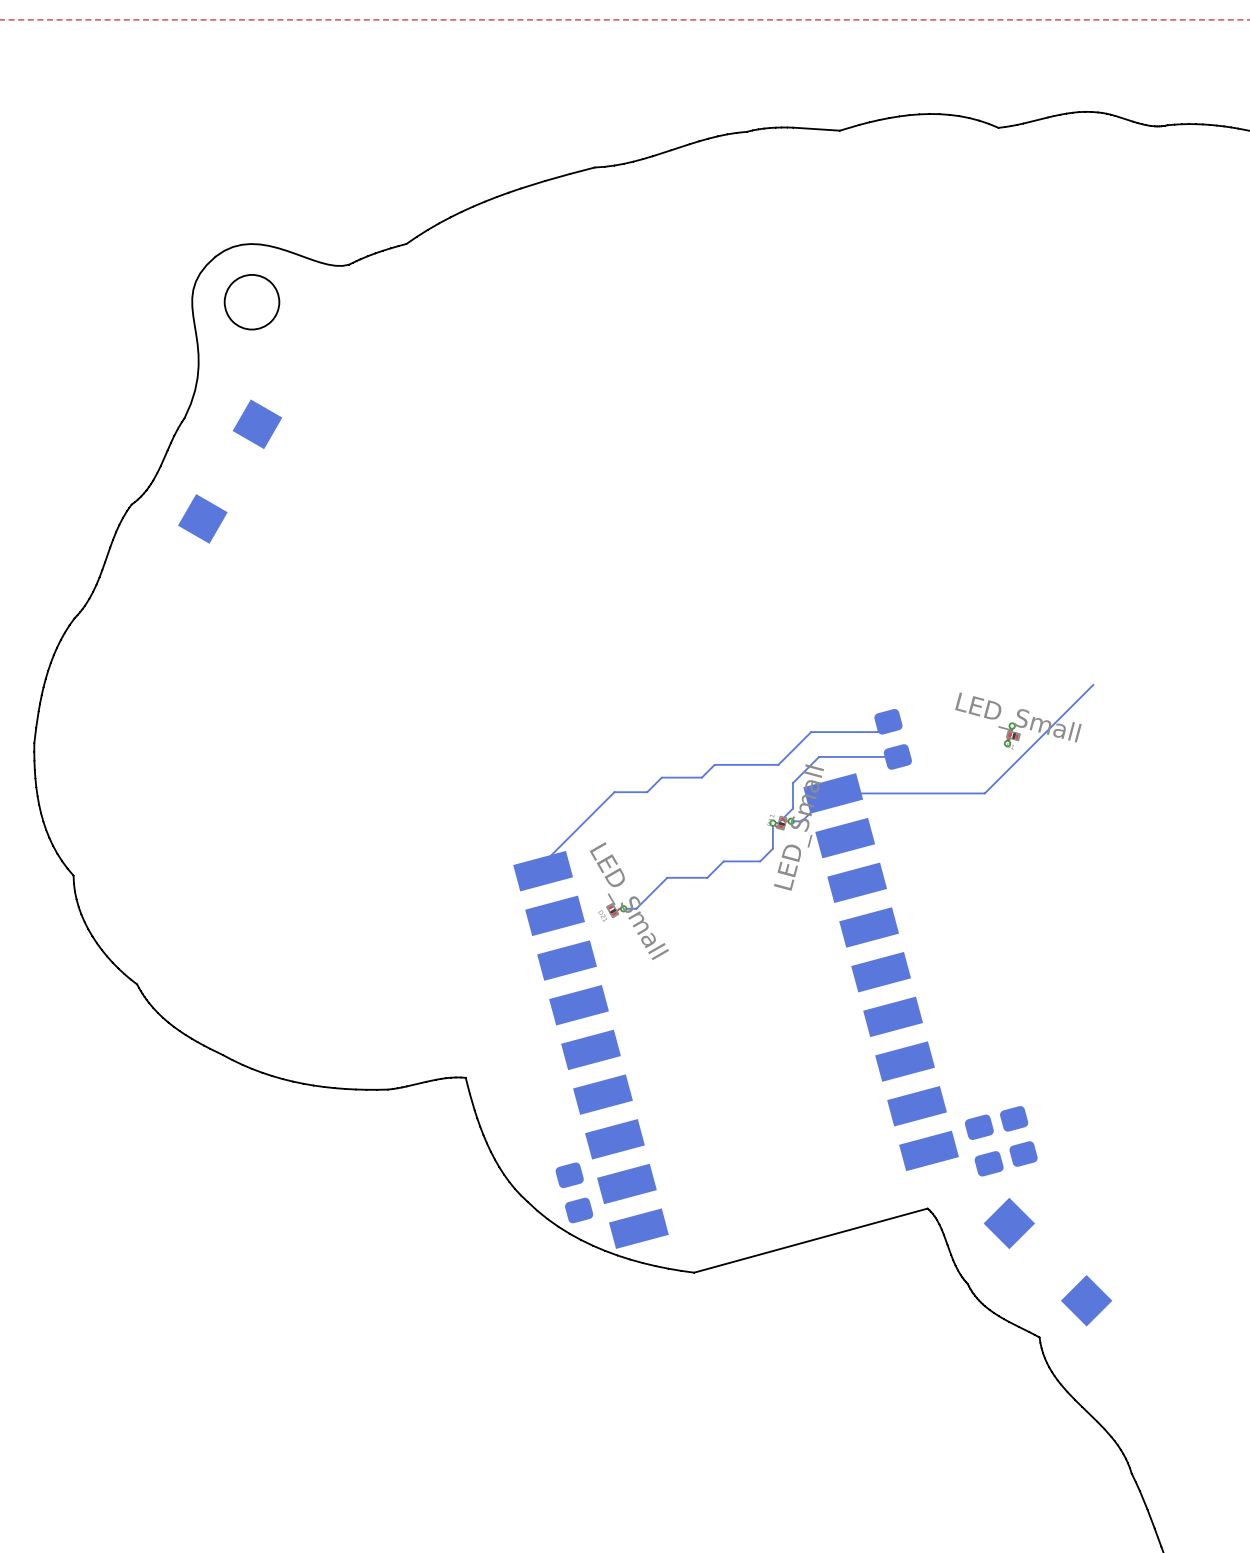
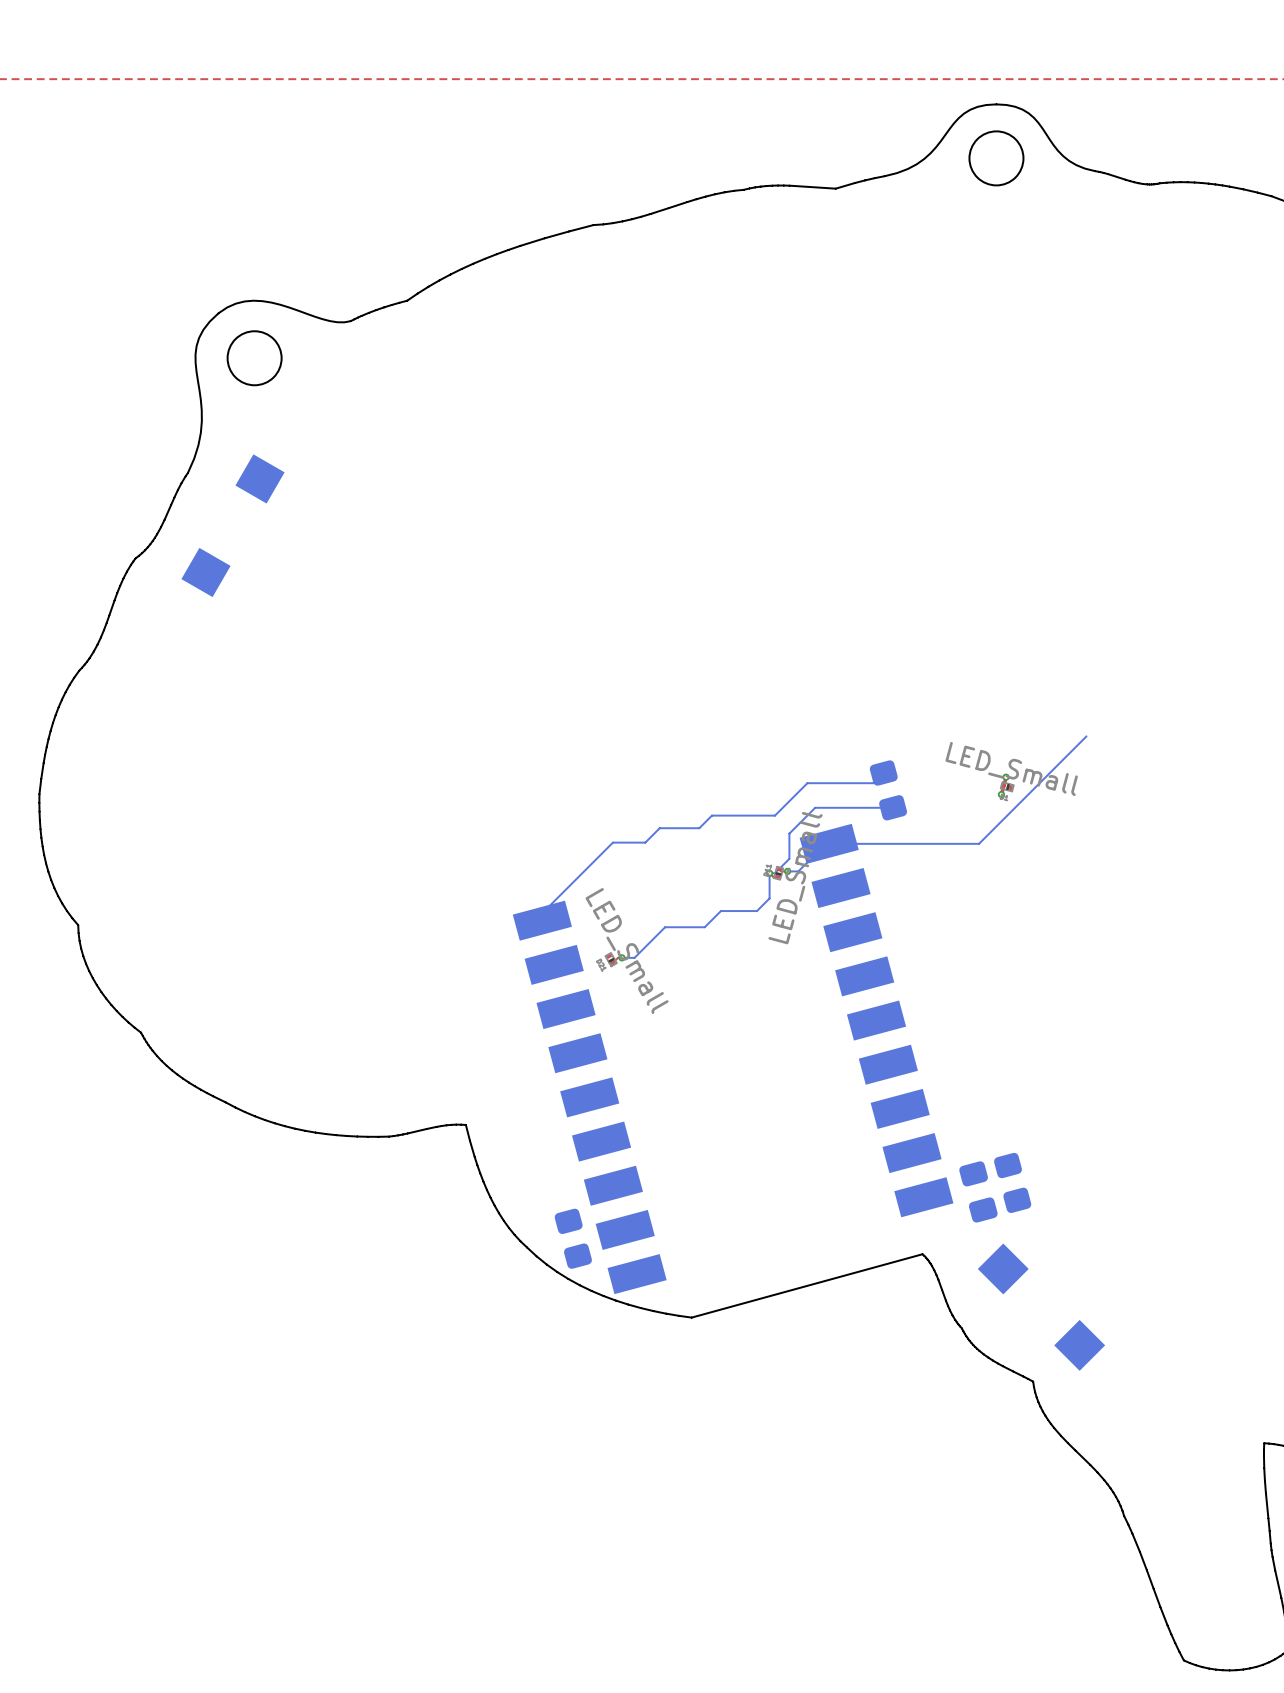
round board edge: none -> [968, 130, 1025, 187]
board edge: (1102, 112) (1066, 113) (998, 127) (979, 120) (949, 114) (919, 114) (889, 118) -> (1095, 171) (1076, 165) (1063, 156) (1038, 122) (1028, 113) (1015, 106) (996, 104) (977, 106) (964, 113) (924, 158) (907, 169) (884, 176)

